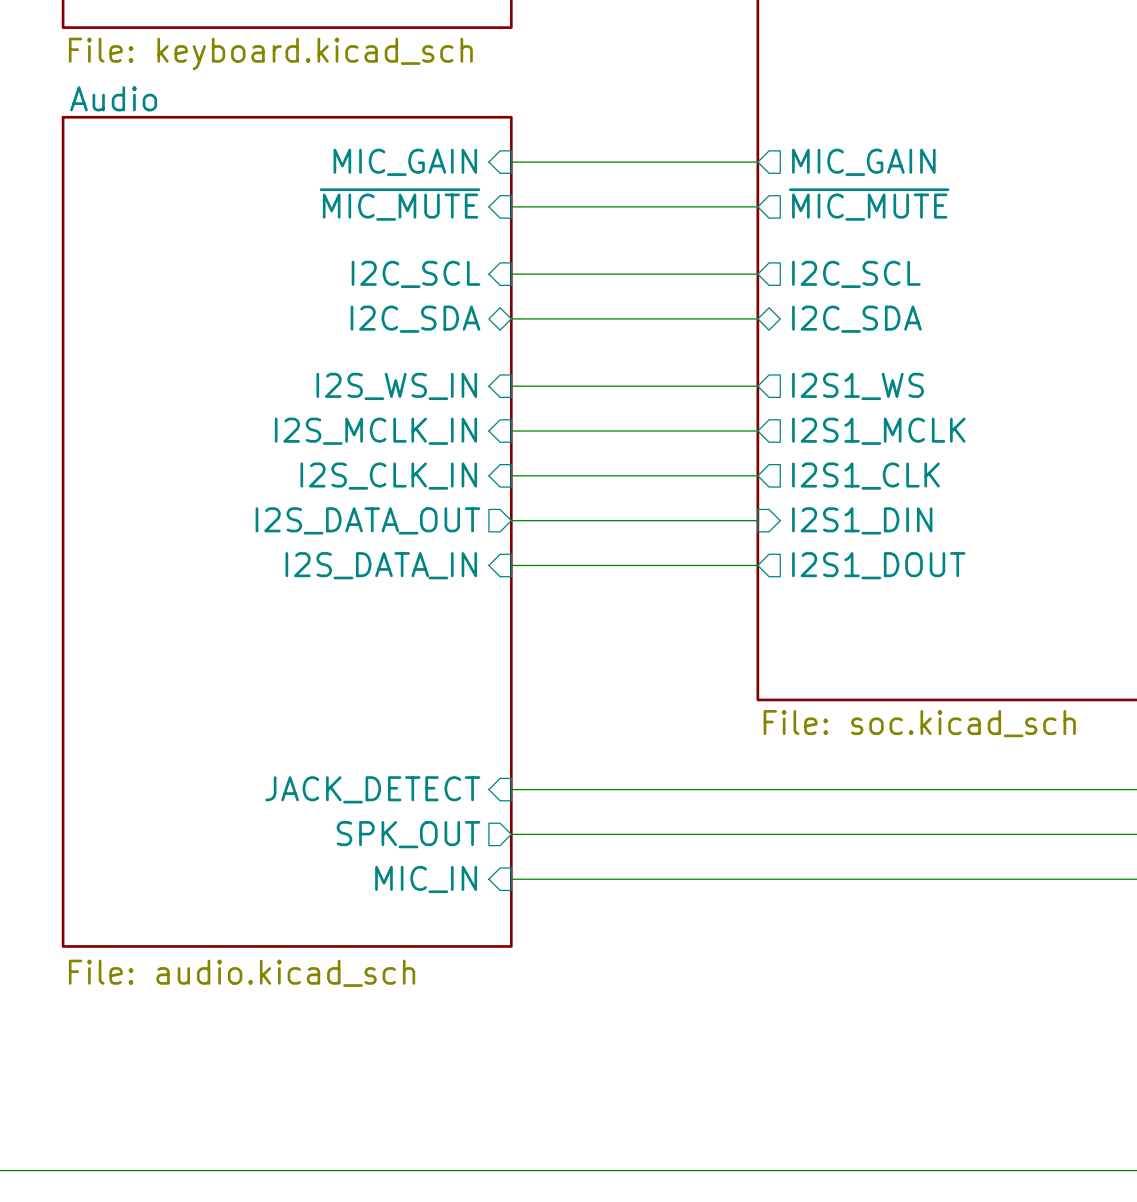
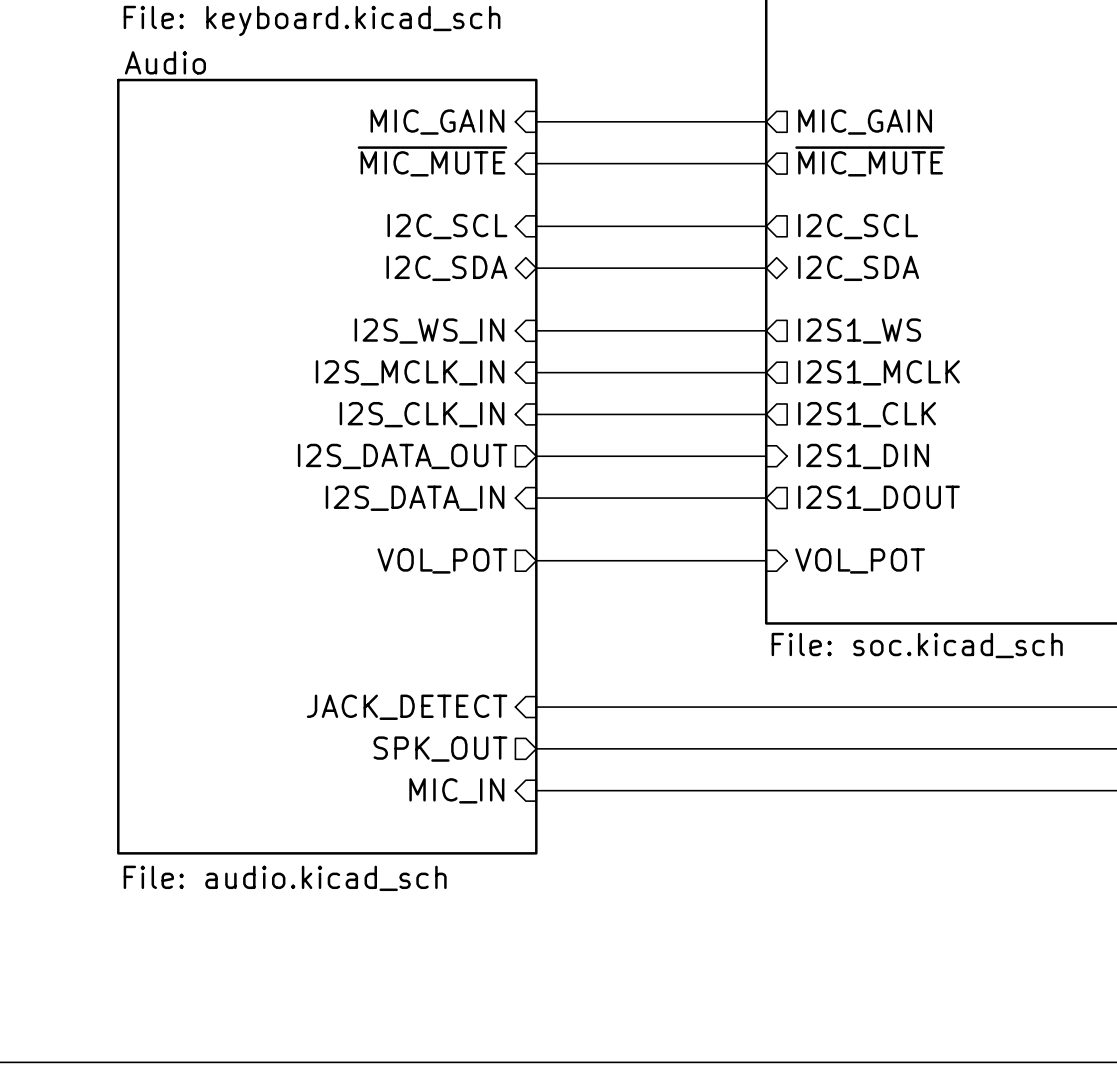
sheet pin: none -> VOL_POT (442, 560)
wire: none -> (536, 560) (766, 560)
sheet pin: none -> VOL_POT (860, 560)

